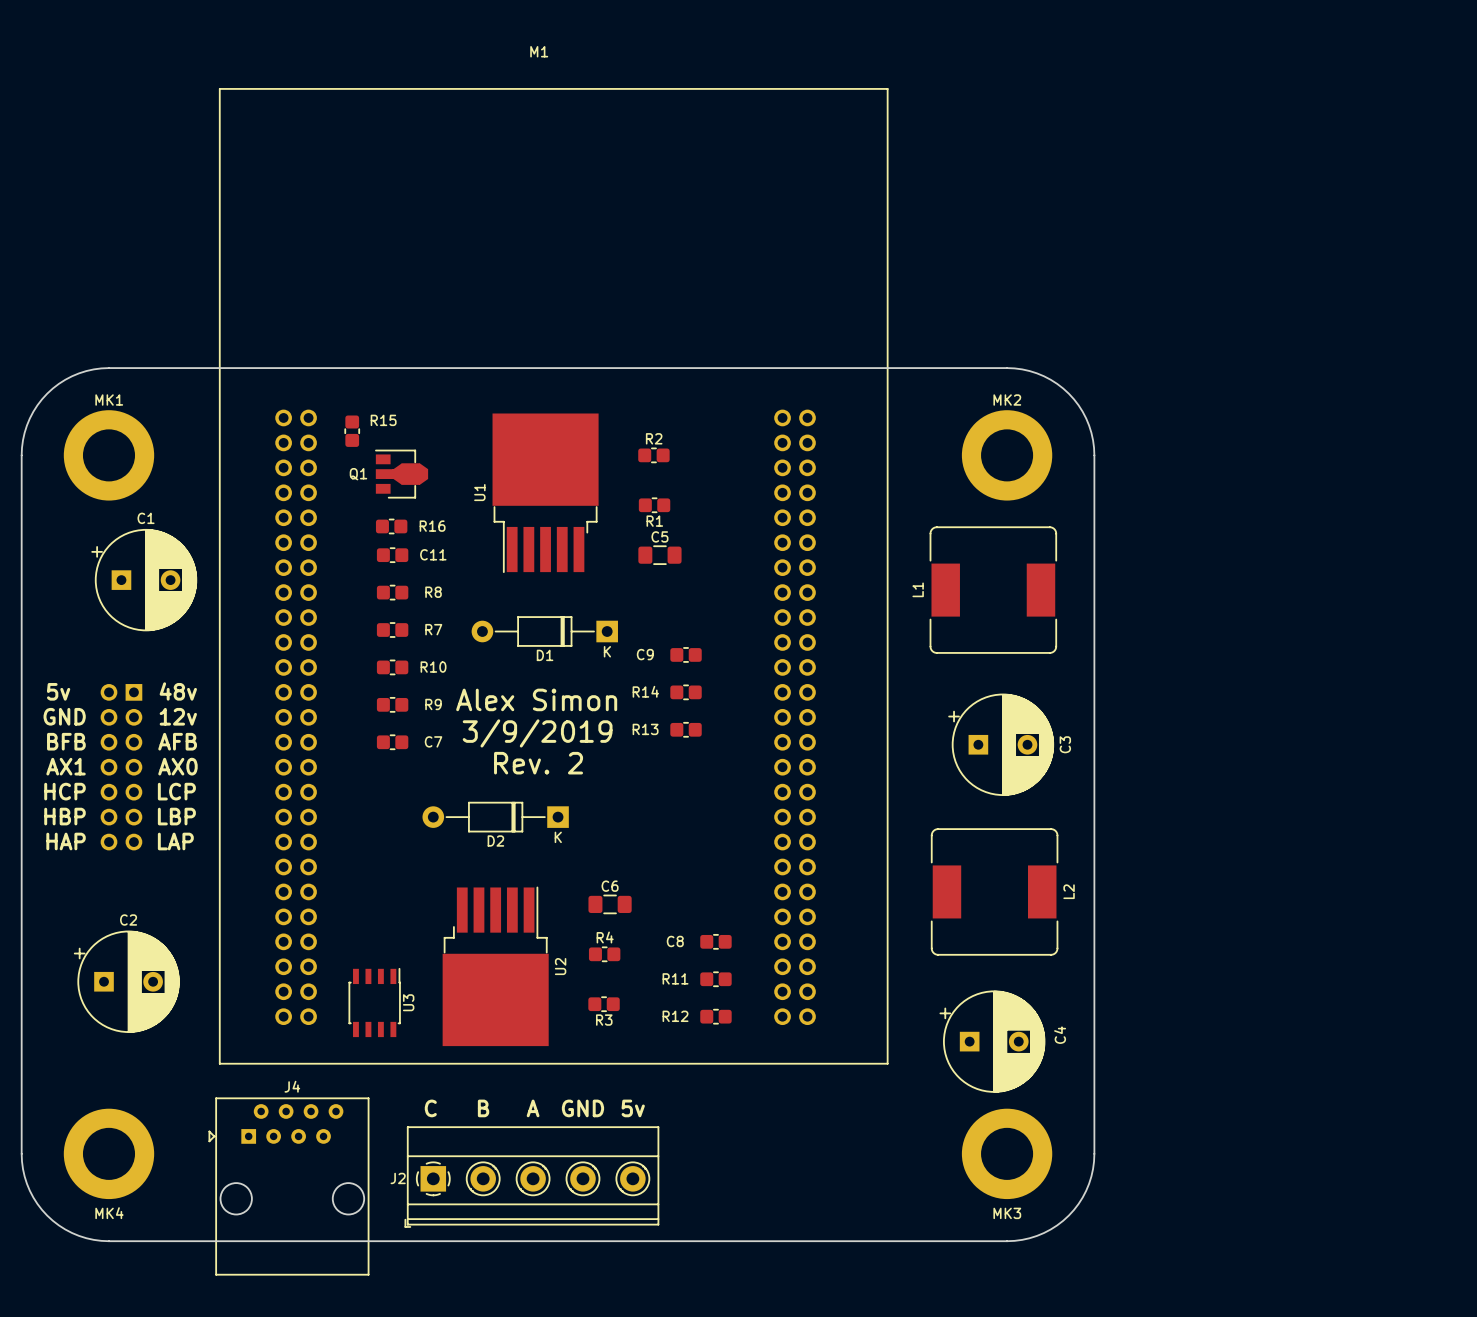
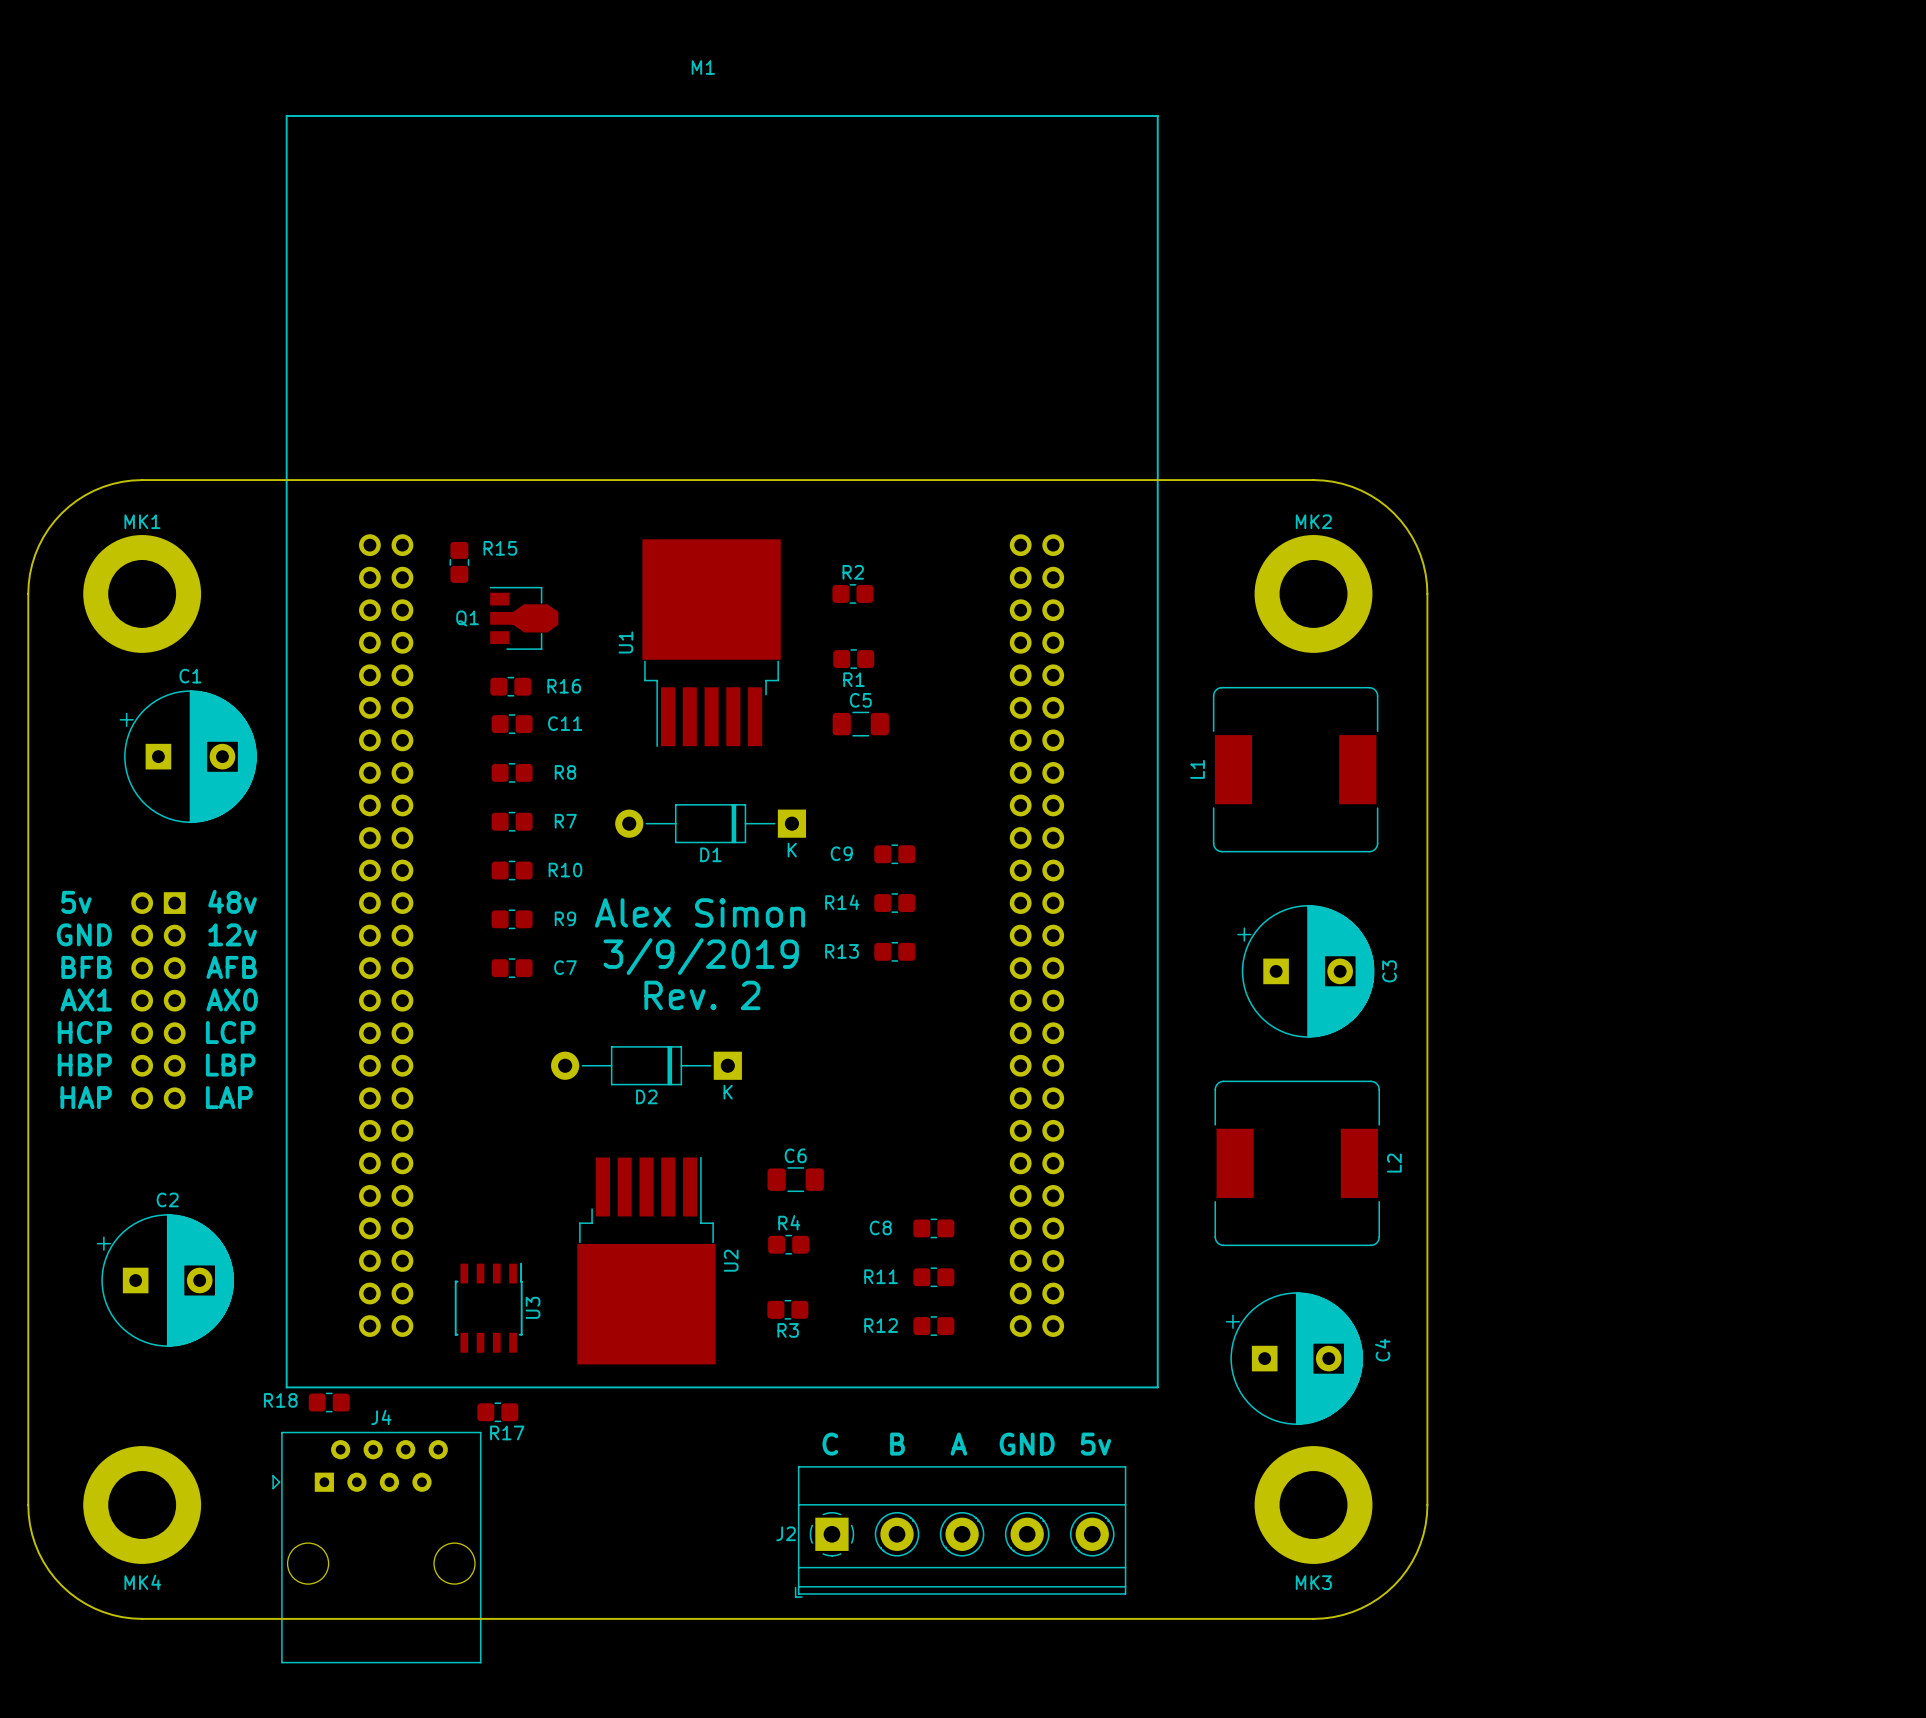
R18: none -> (329, 1402)
R17: none -> (497, 1412)
text: none -> 5v (1095, 1444)
text: C (430, 1108) -> none
text position: B (483, 1108) -> B (897, 1444)
text position: A (533, 1108) -> A (958, 1444)
text position: GND (582, 1108) -> GND (1027, 1444)
text: 5v (633, 1108) -> C (830, 1444)
J2 position: (531, 1177) -> (960, 1531)

